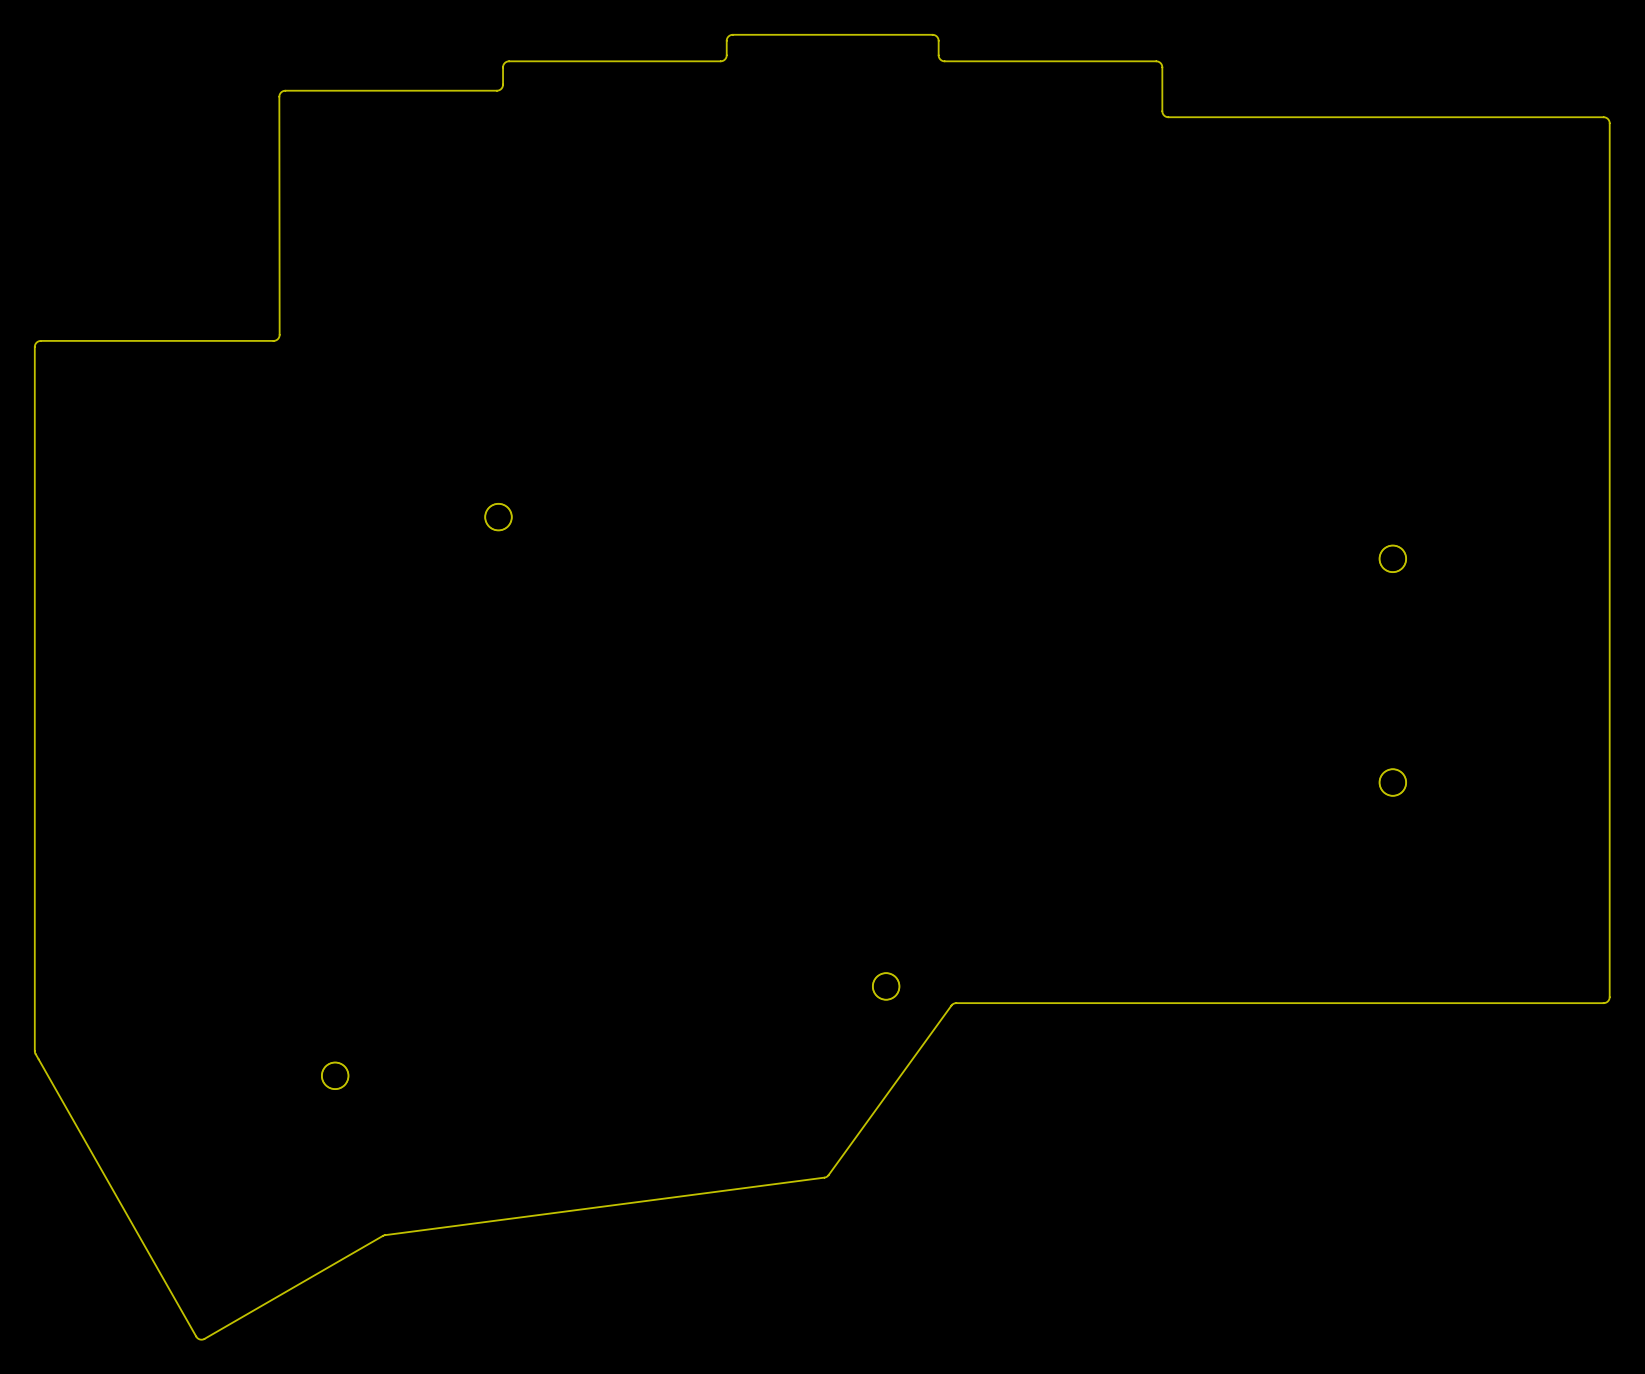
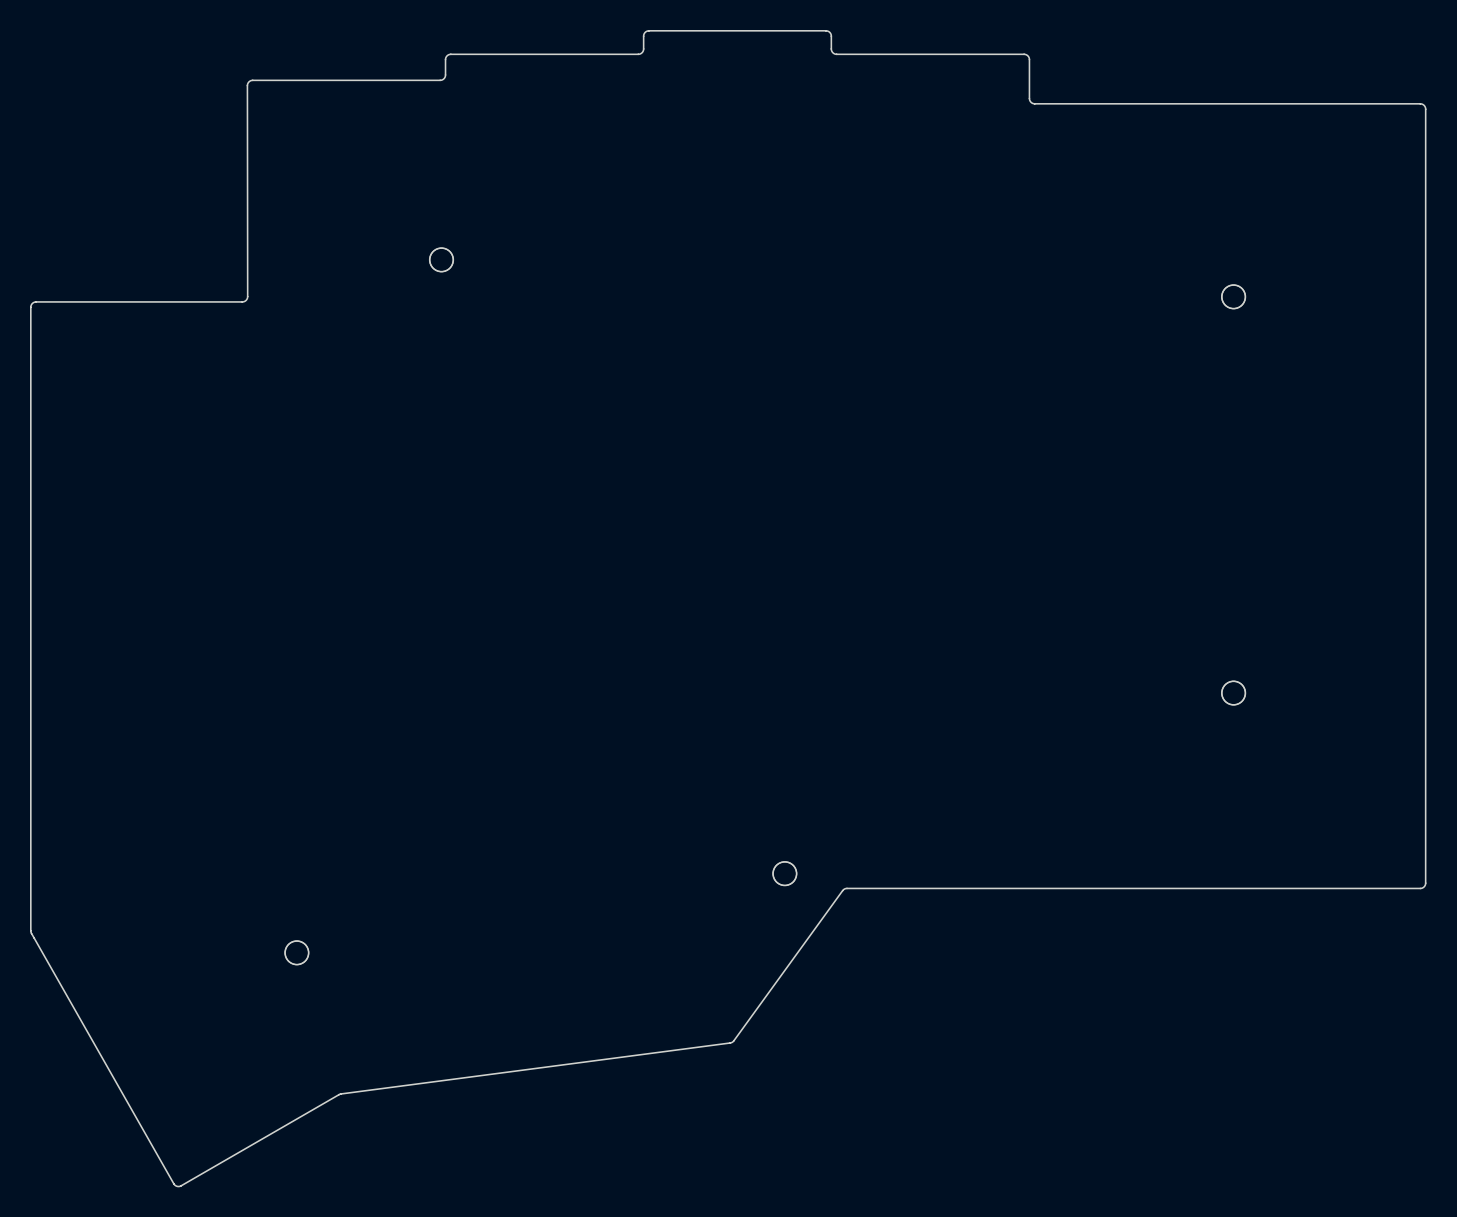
round board edge position: (498, 517) -> (441, 259)
round board edge position: (1392, 558) -> (1233, 296)

